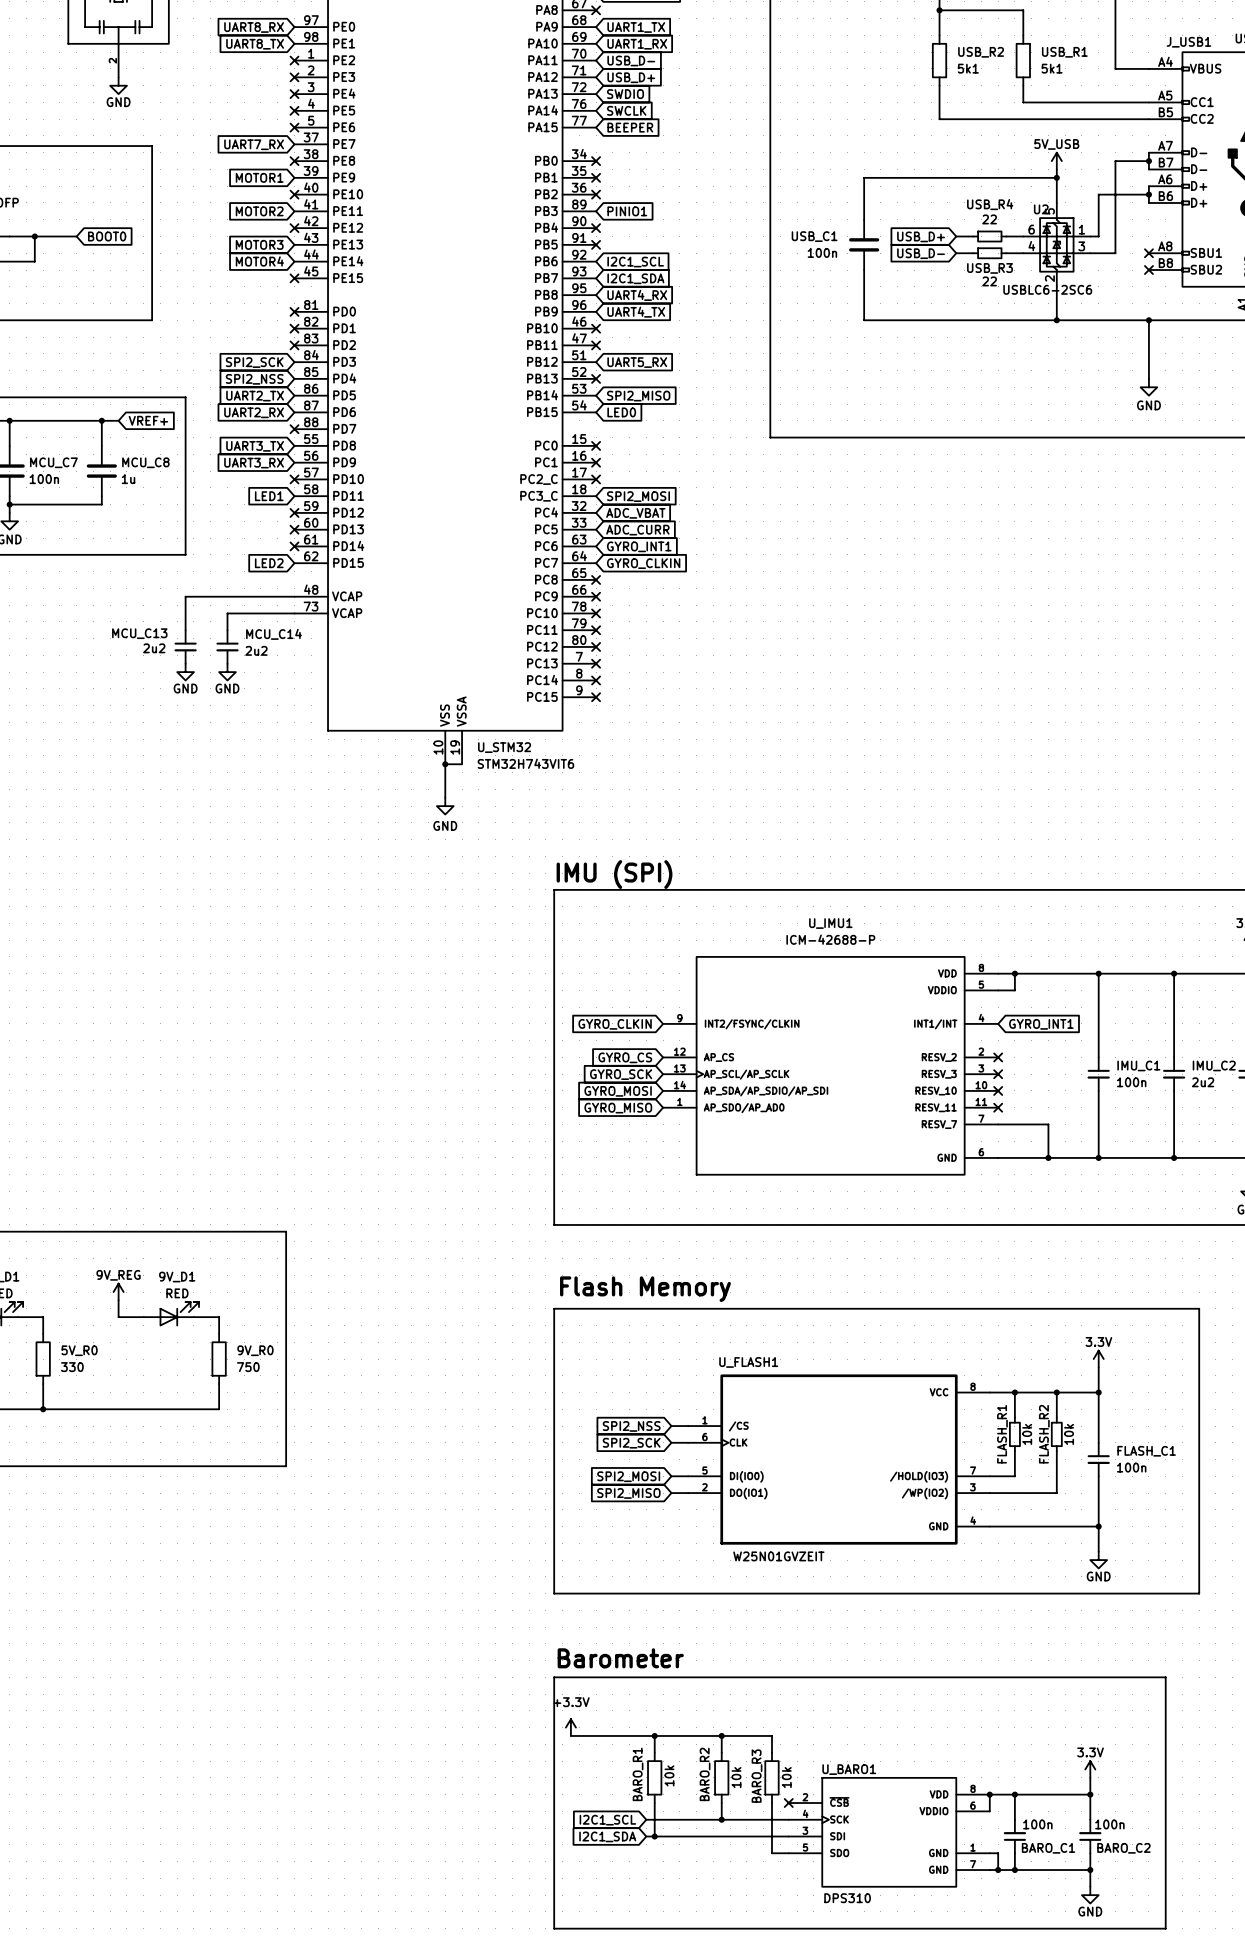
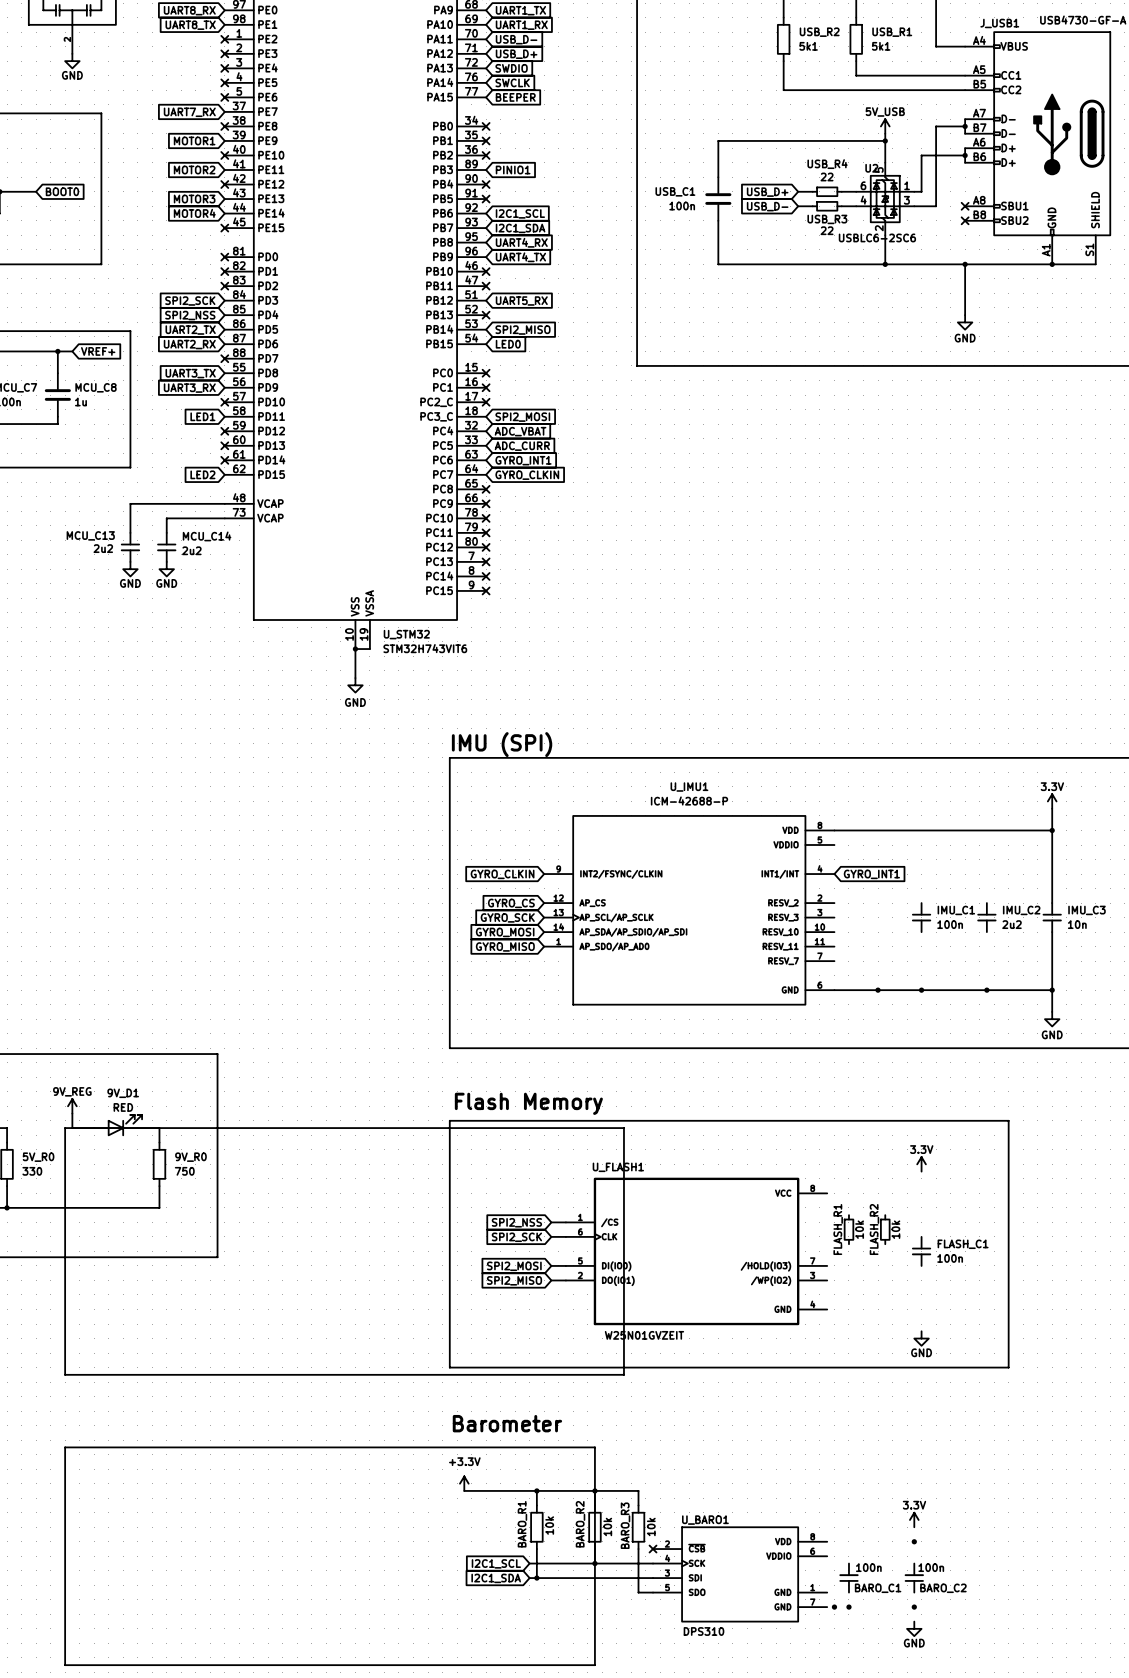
wire: (1014, 973) (1014, 990) (998, 990) -> none
junction: (1014, 973) -> none
wire: (1098, 973) (1098, 1057) -> none
junction: (1098, 973) -> none
wire: (1174, 973) (1174, 1057) -> none
junction: (1174, 973) -> none
no-connect mark: (998, 1057) -> none
no-connect mark: (998, 1074) -> none
no-connect mark: (998, 1090) -> none
wire: (1098, 1090) (1098, 1157) -> none
wire: (1174, 1090) (1174, 1157) -> none
no-connect mark: (998, 1107) -> none
wire: (998, 1124) (1048, 1124) (1048, 1157) -> none
line: none -> (65, 1128) (65, 1374) (623, 1374) (623, 1128) (65, 1128)
wire: (1098, 1367) (1098, 1442) -> none
wire: (989, 1392) (1098, 1392) -> none
wire: (1014, 1392) (1014, 1417) -> none
junction: (1014, 1392) -> none
wire: (1056, 1392) (1056, 1417) -> none
junction: (1056, 1392) -> none
junction: (1098, 1392) -> none
wire: (1014, 1451) (1014, 1476) (989, 1476) -> none
wire: (1056, 1451) (1056, 1493) (989, 1493) -> none
wire: (1098, 1476) (1098, 1551) -> none
wire: (989, 1526) (1098, 1526) -> none
junction: (1098, 1526) -> none
line: (554, 1677) (1165, 1677) (1165, 1928) (554, 1928) (554, 1677) -> none
line: none -> (65, 1447) (594, 1447) (594, 1665) (65, 1665) (65, 1447)
wire: (1090, 1777) (1090, 1819) -> none
junction: (989, 1794) -> none
wire: (1014, 1794) (1014, 1819) -> none
junction: (1014, 1794) -> none
wire: (1090, 1794) (989, 1794) (989, 1811) -> none
wire: (989, 1853) (998, 1853) (998, 1870) -> none
wire: (1014, 1853) (1014, 1870) -> none
wire: (1090, 1853) (1090, 1886) -> none
wire: (989, 1870) (1090, 1870) -> none

